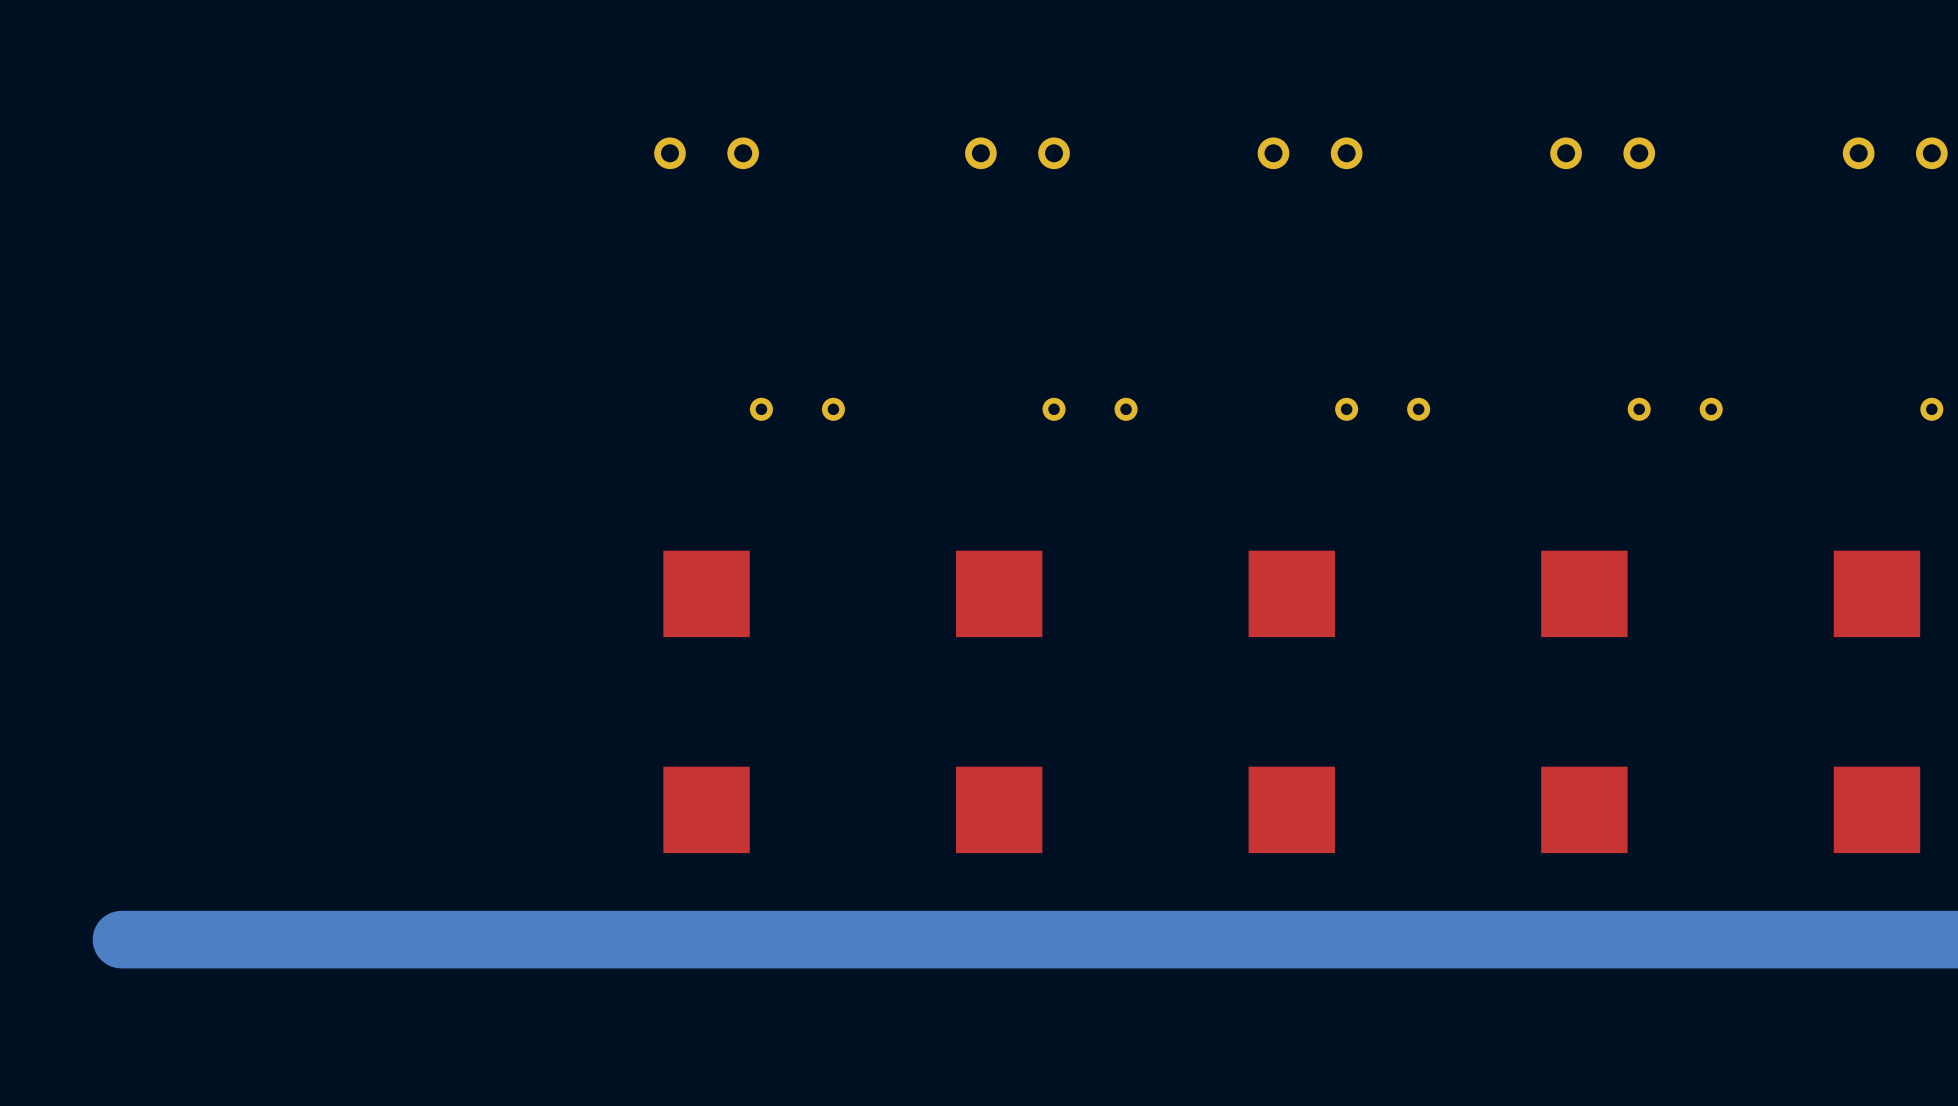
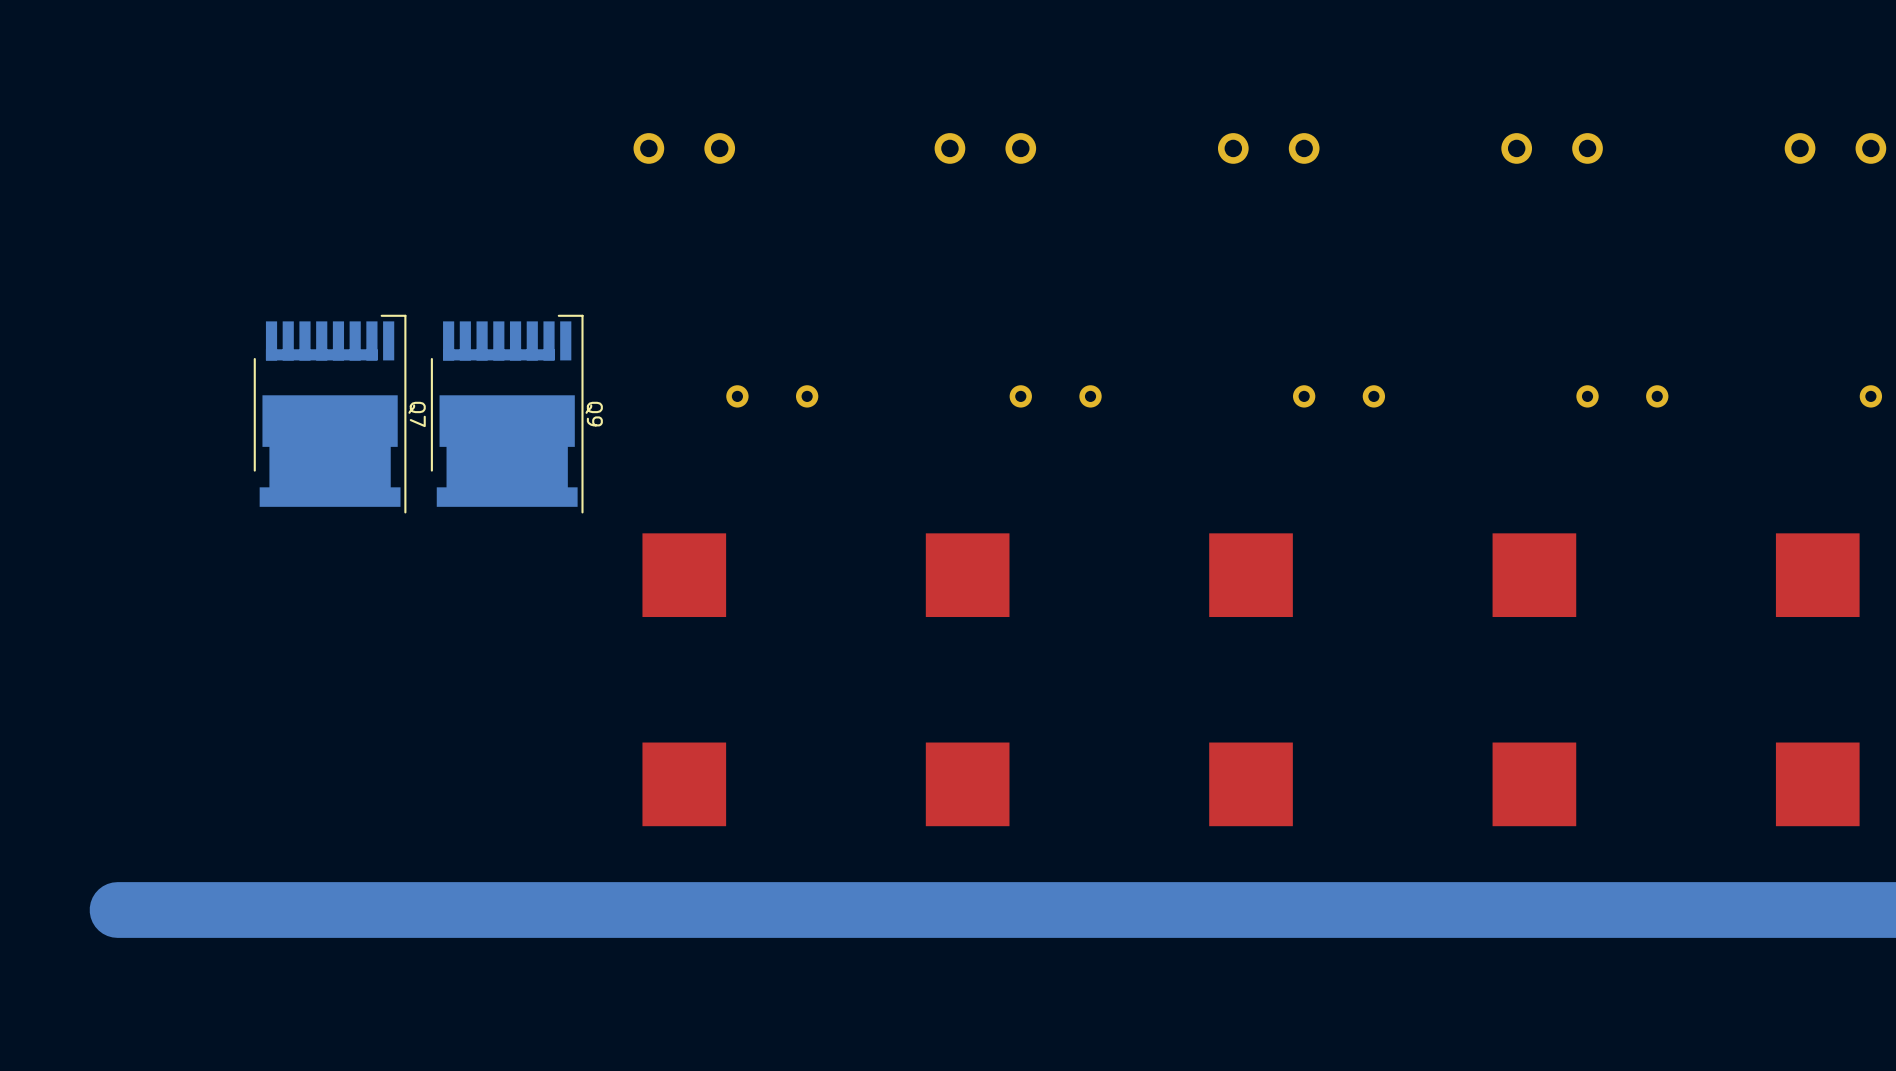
Q7: none -> (330, 414)
Q9: none -> (507, 414)

